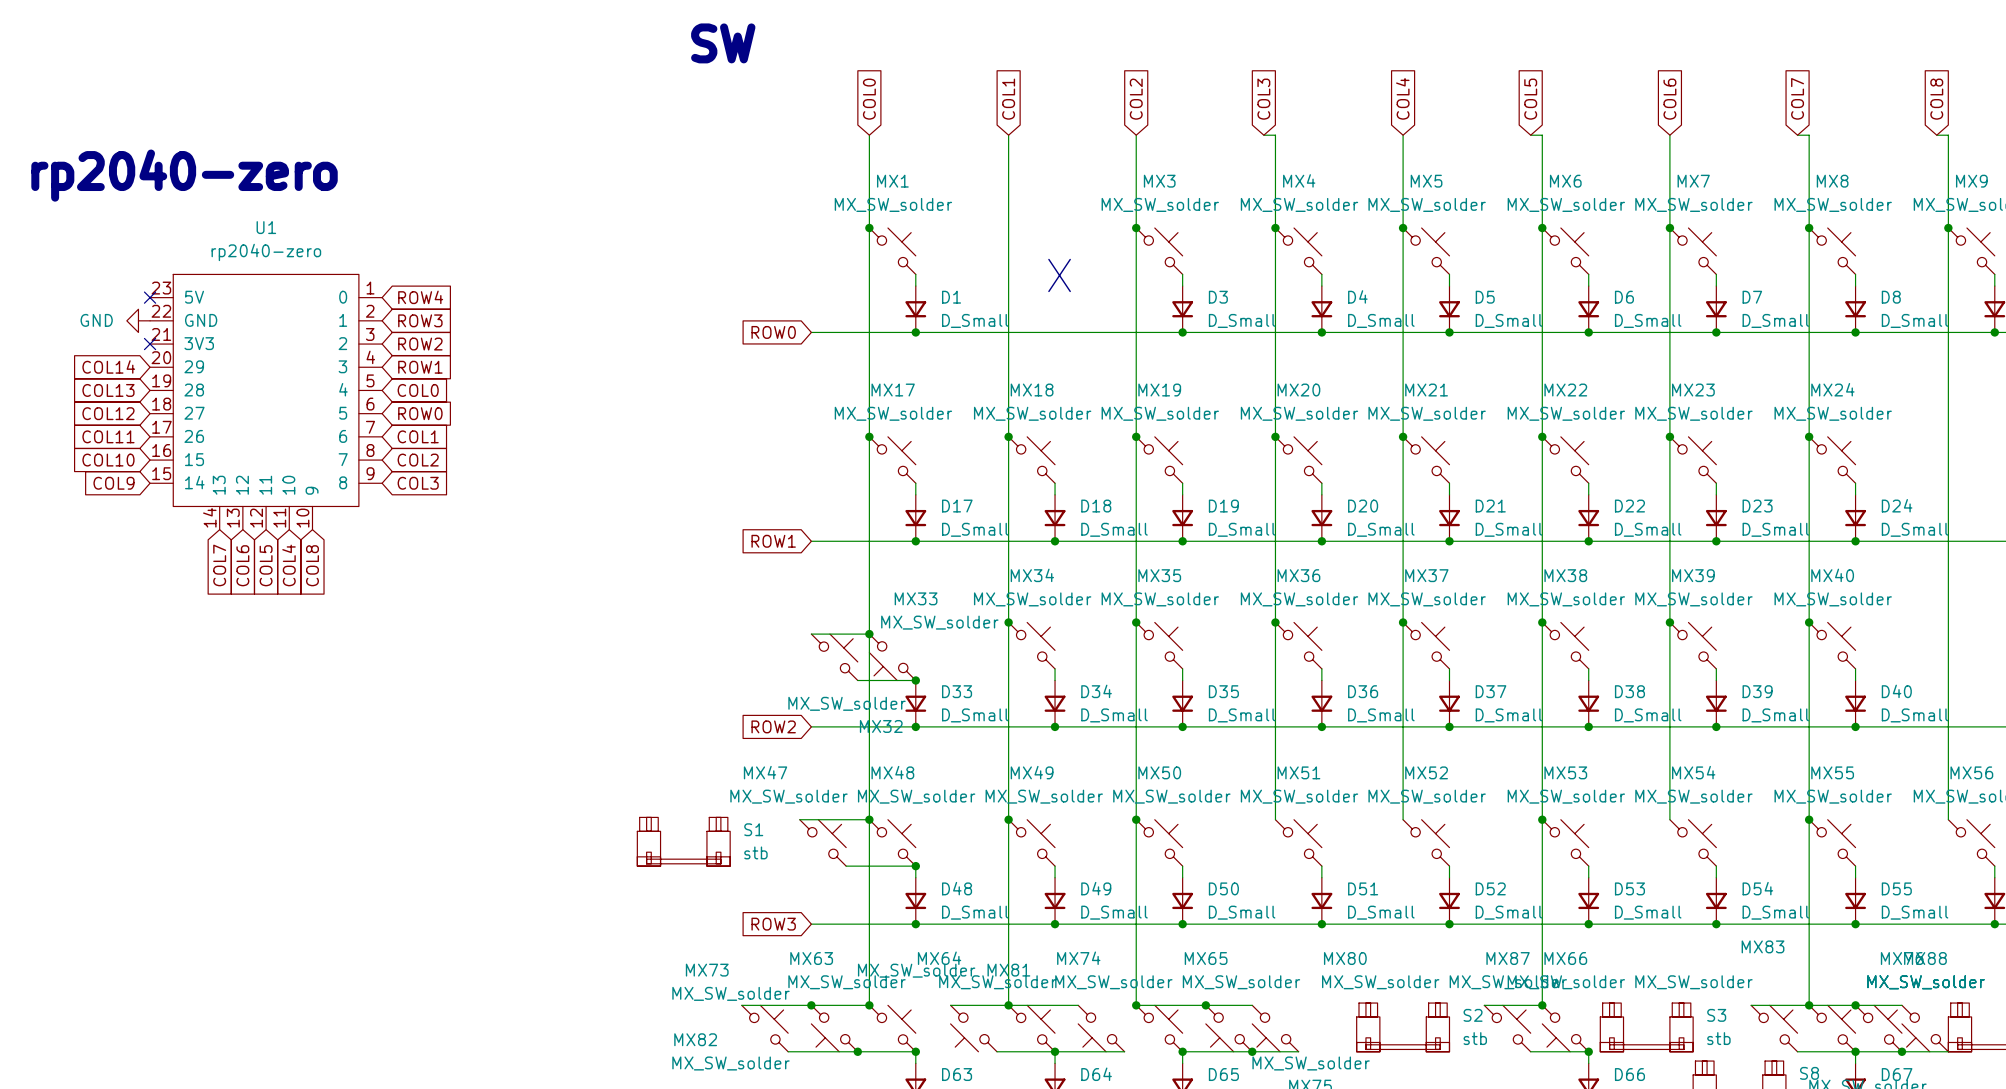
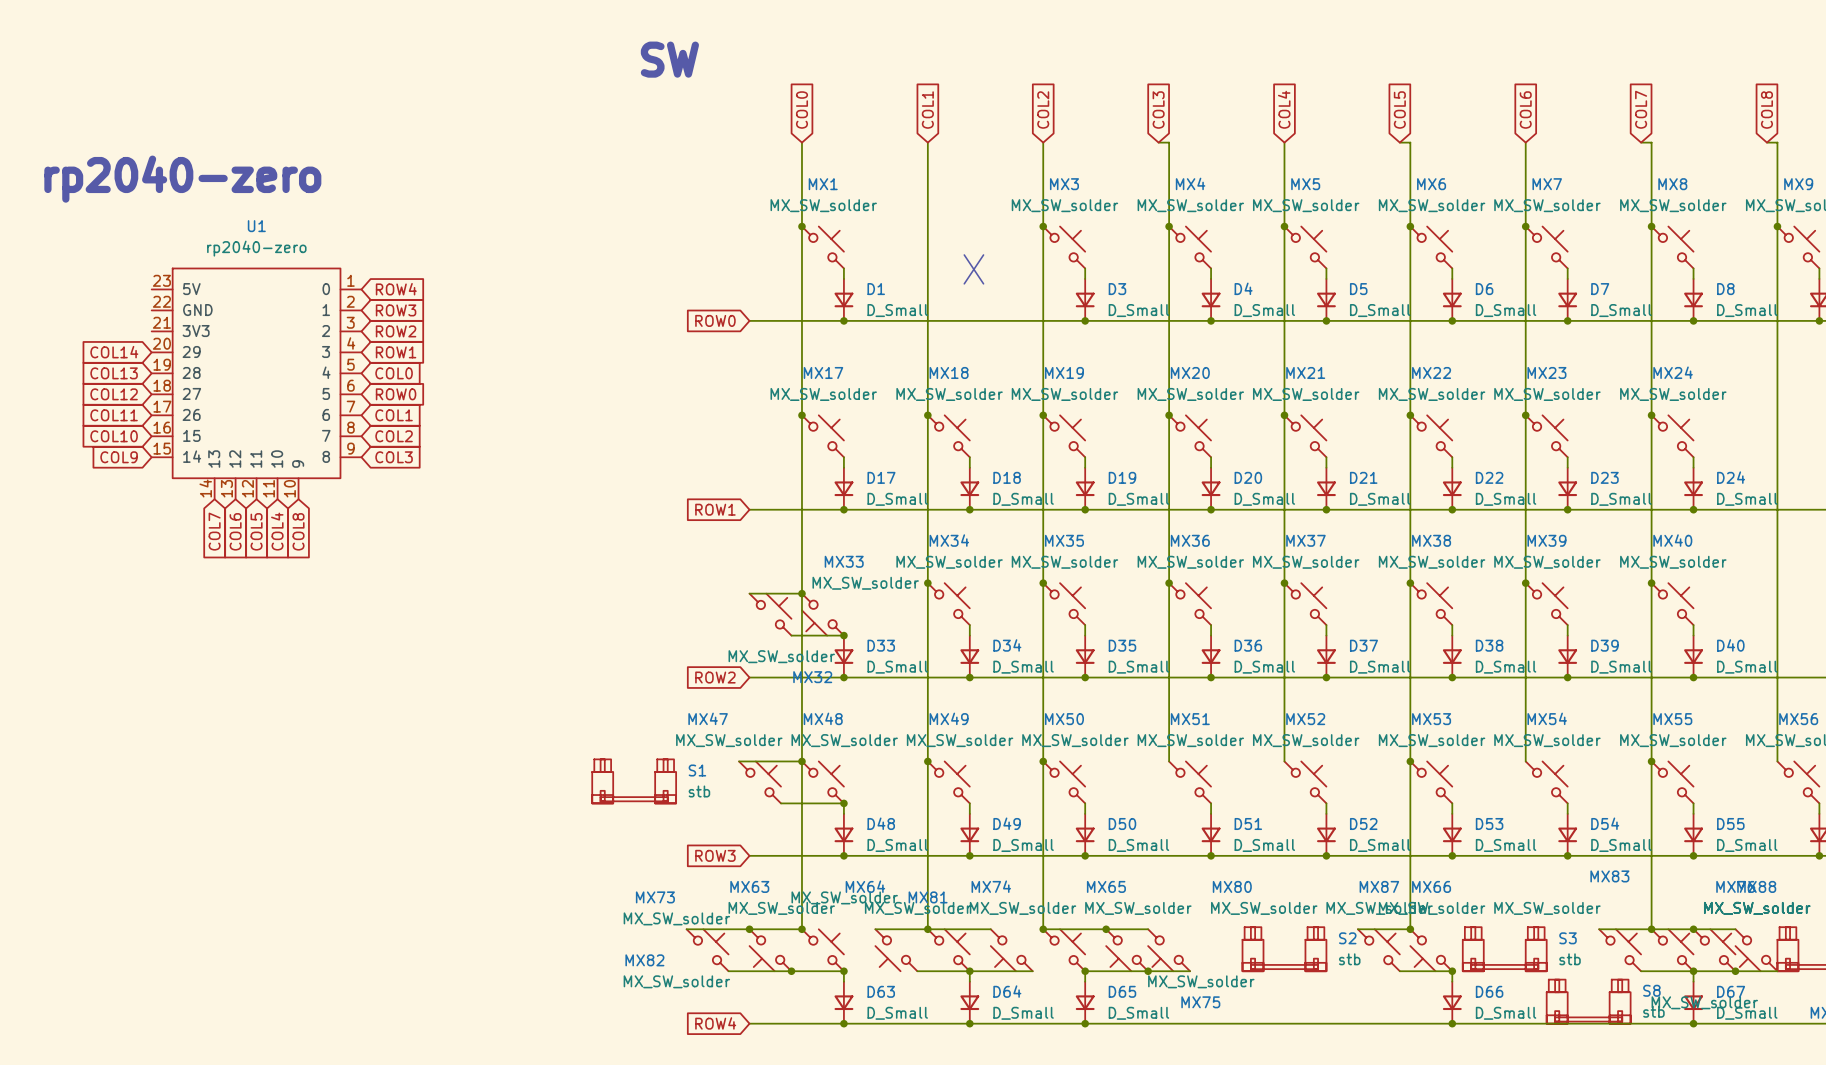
no-connect mark: (150, 297) -> none
power symbol: GND (138, 320) -> none
no-connect mark: (150, 344) -> none

